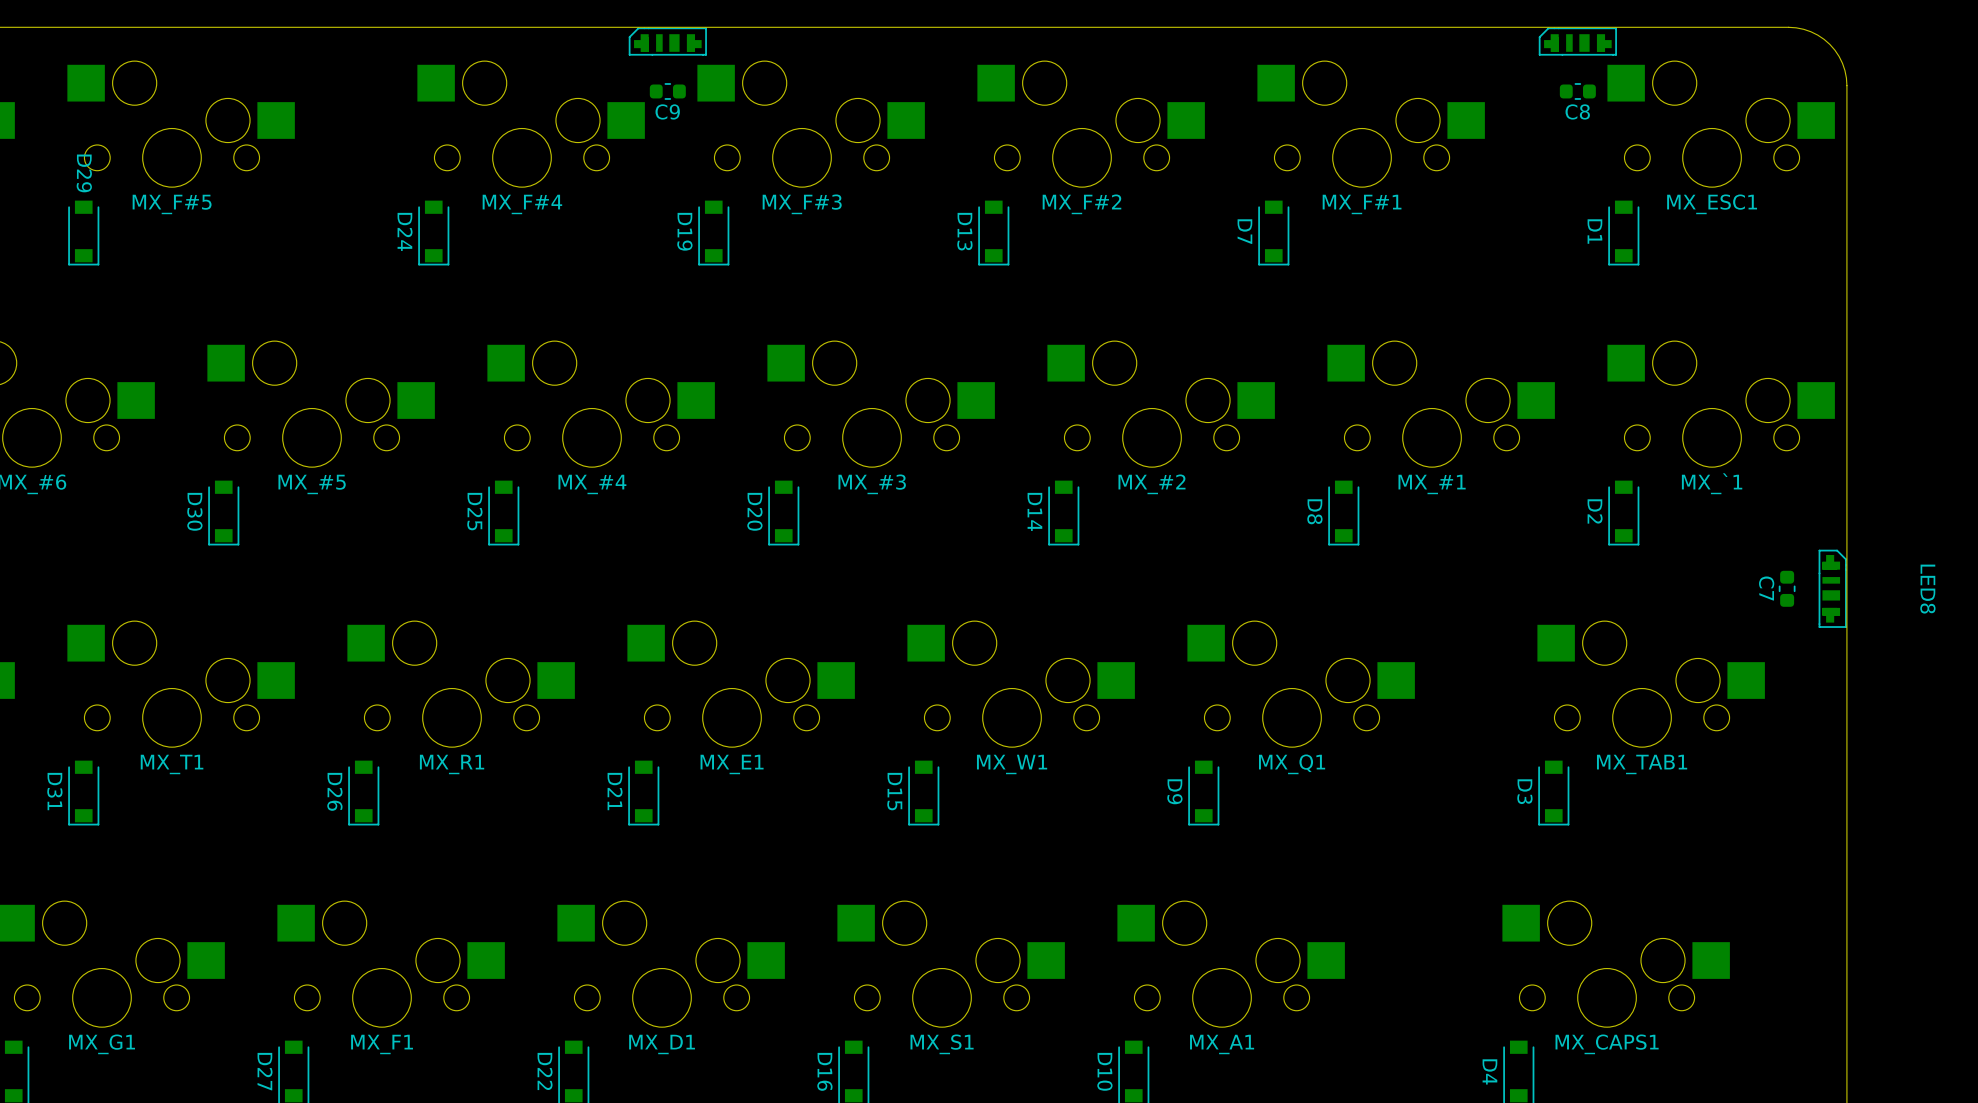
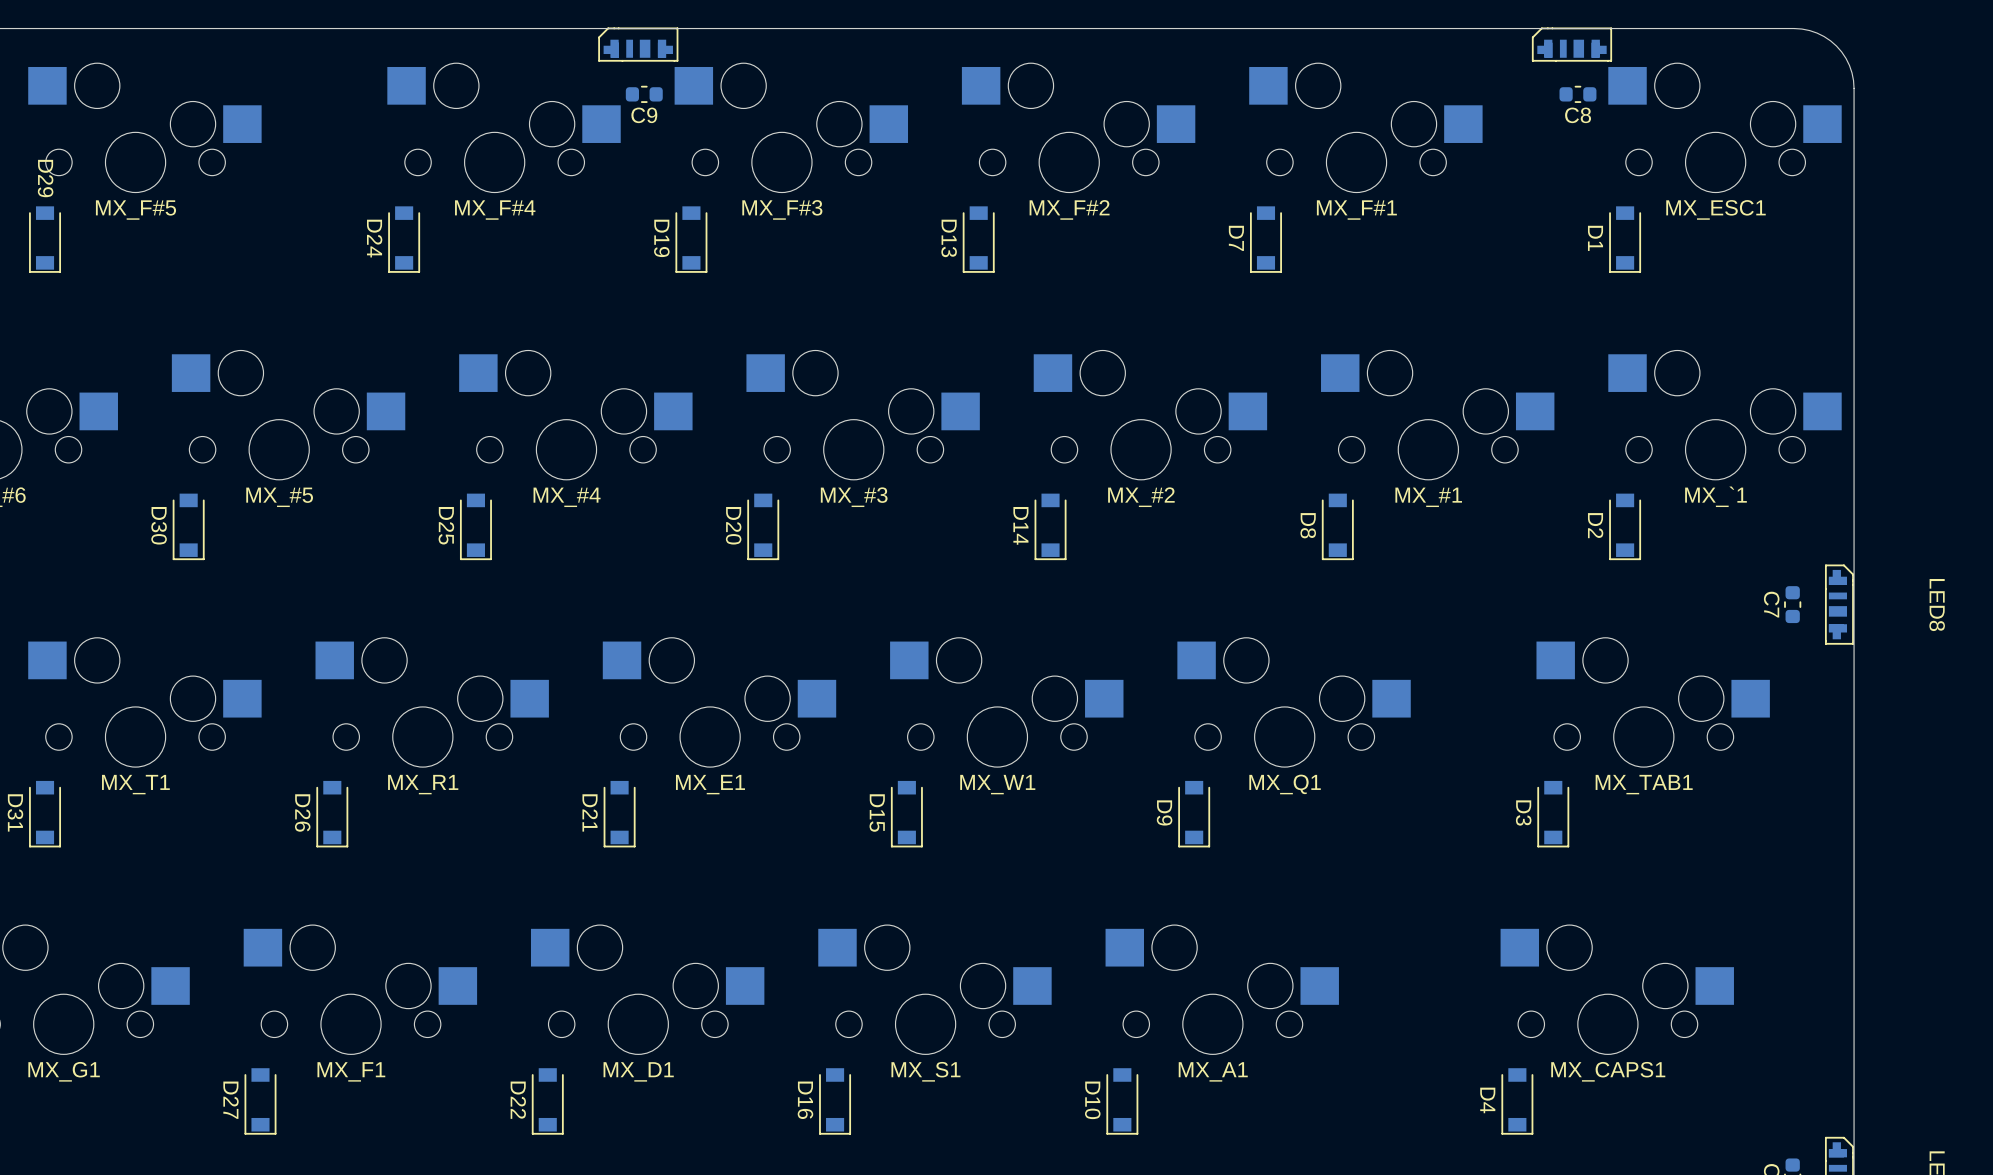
part footprint: [628, 27, 707, 56] -> [598, 27, 679, 62]
part footprint: [1538, 27, 1617, 56] -> [1531, 27, 1613, 62]

